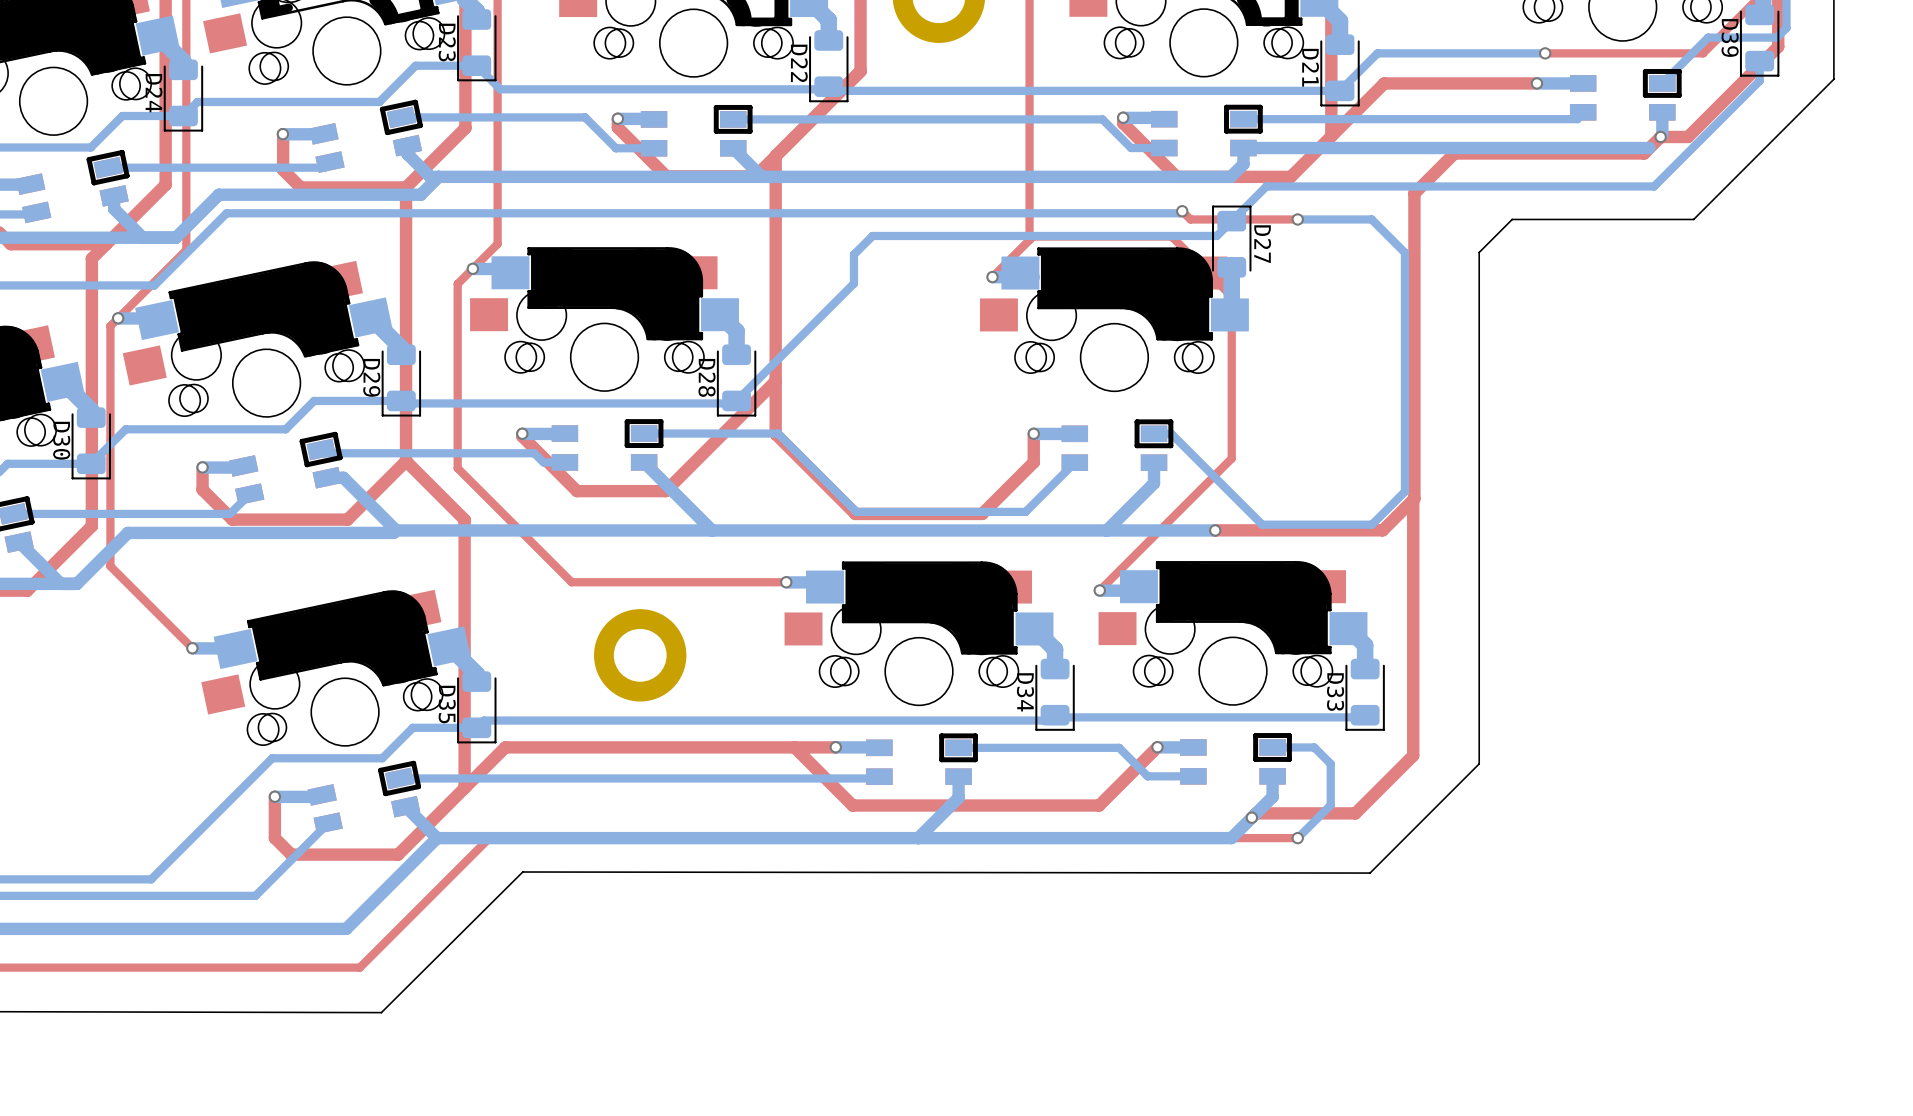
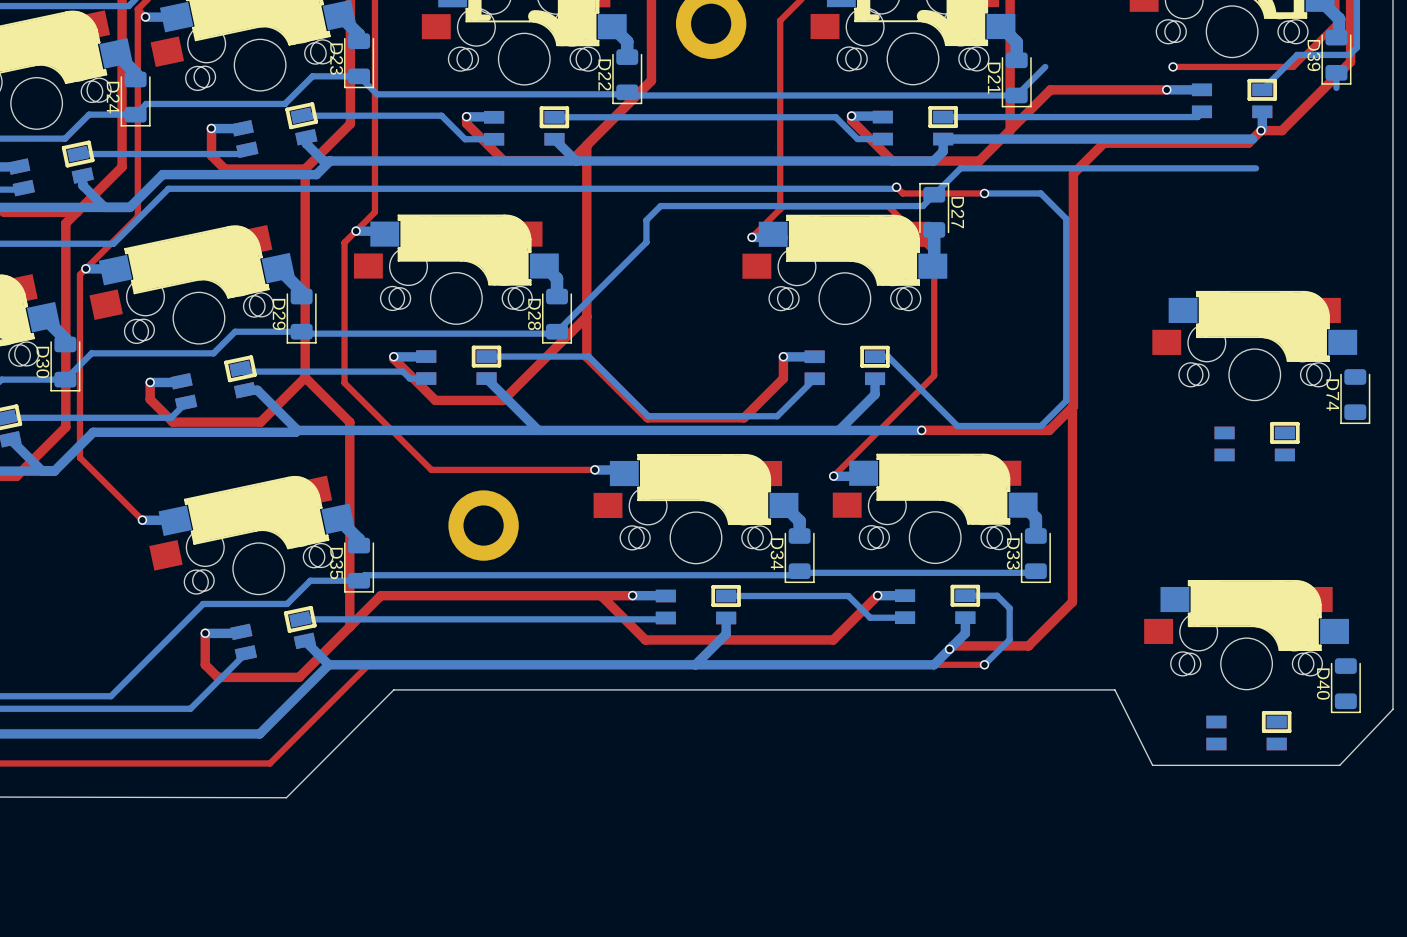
bottom track: (1545, 53) (1377, 53) -> none
board edge: (1833, 79) (1693, 219) (1512, 219) (1479, 252) (1479, 763) (1370, 873) (522, 871) (381, 1012) -> (1393, 86) (1393, 709) (1339, 765) (1152, 765) (1114, 689) (393, 689) (286, 797)
bottom track: (1759, 80) (1654, 186) -> none
part: none -> (1254, 376)
D74: none -> (1355, 396)
part: none -> (1246, 665)
D40: none -> (1345, 685)

